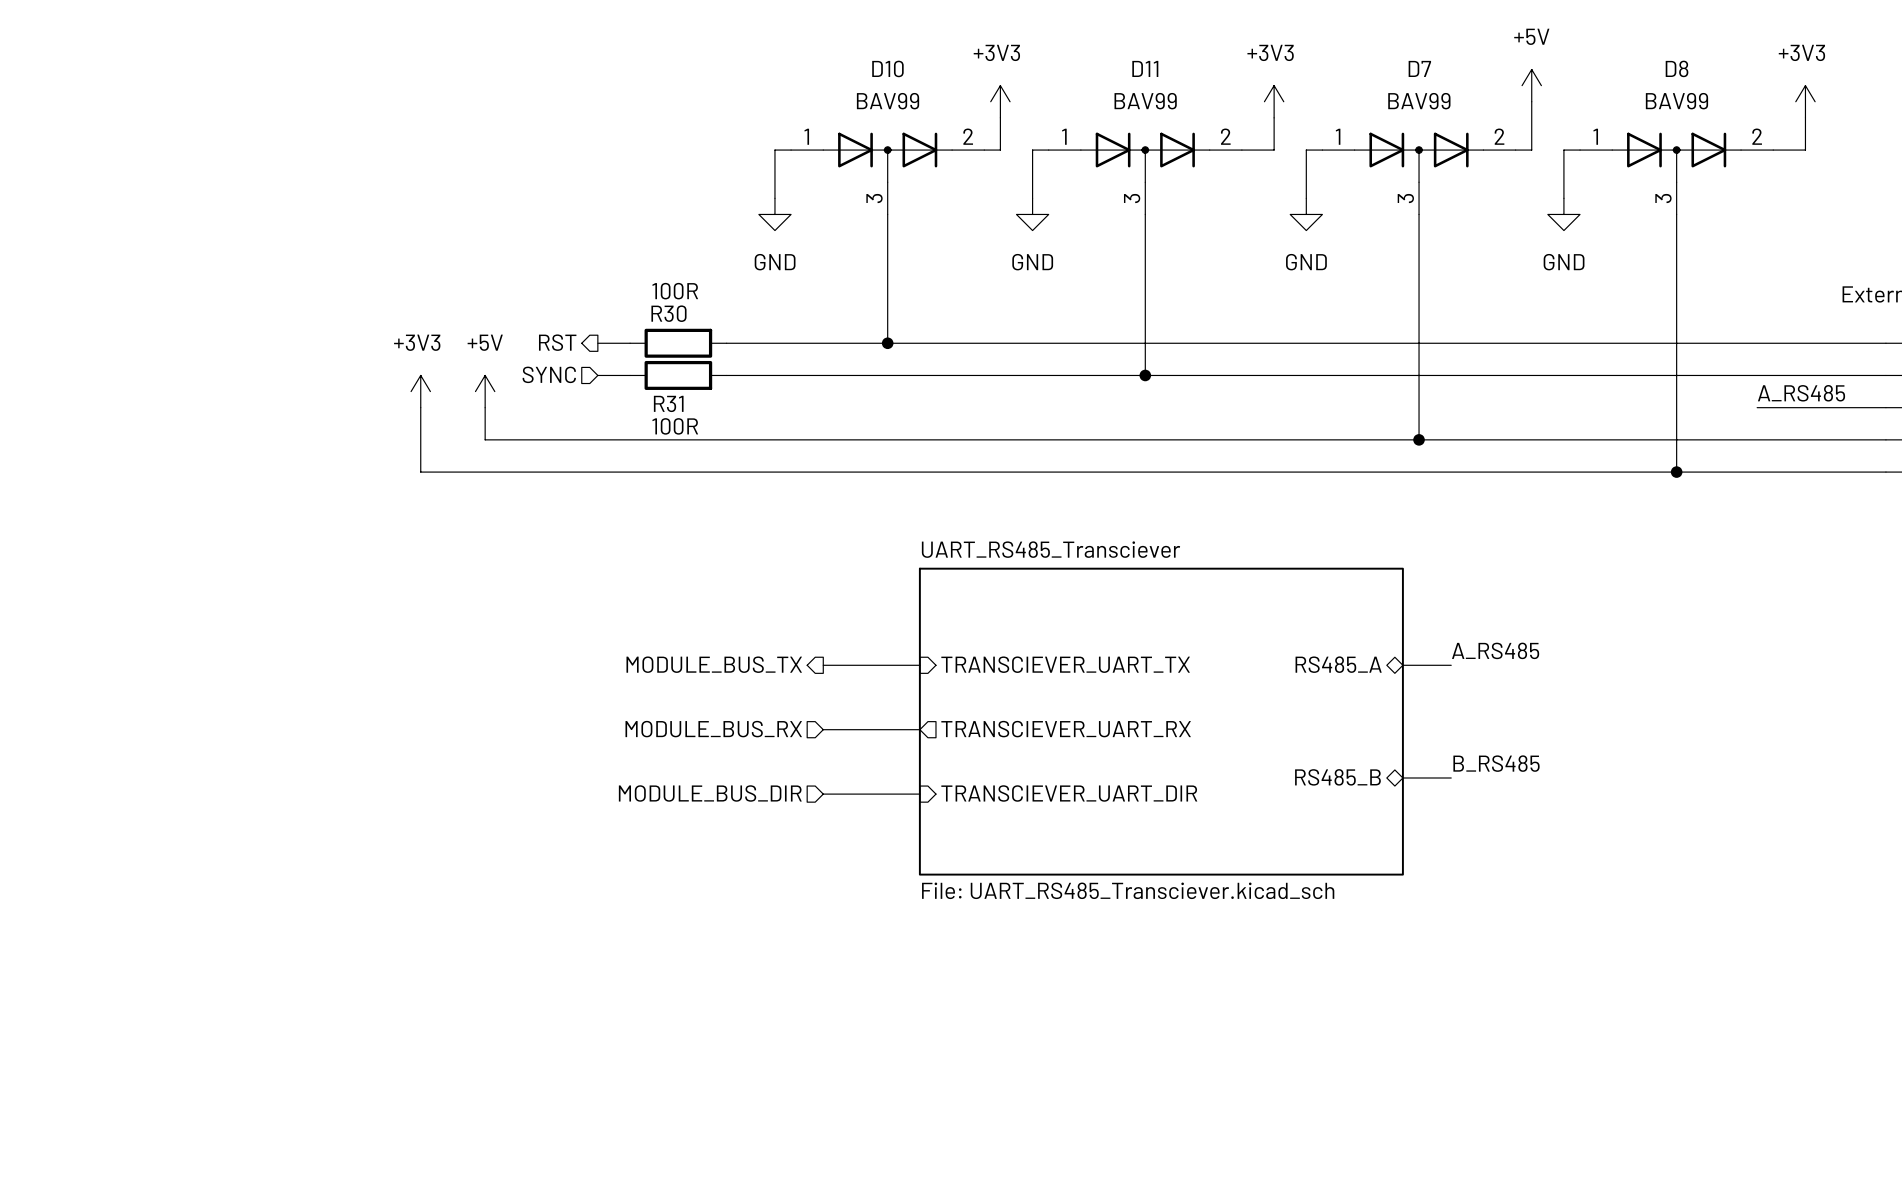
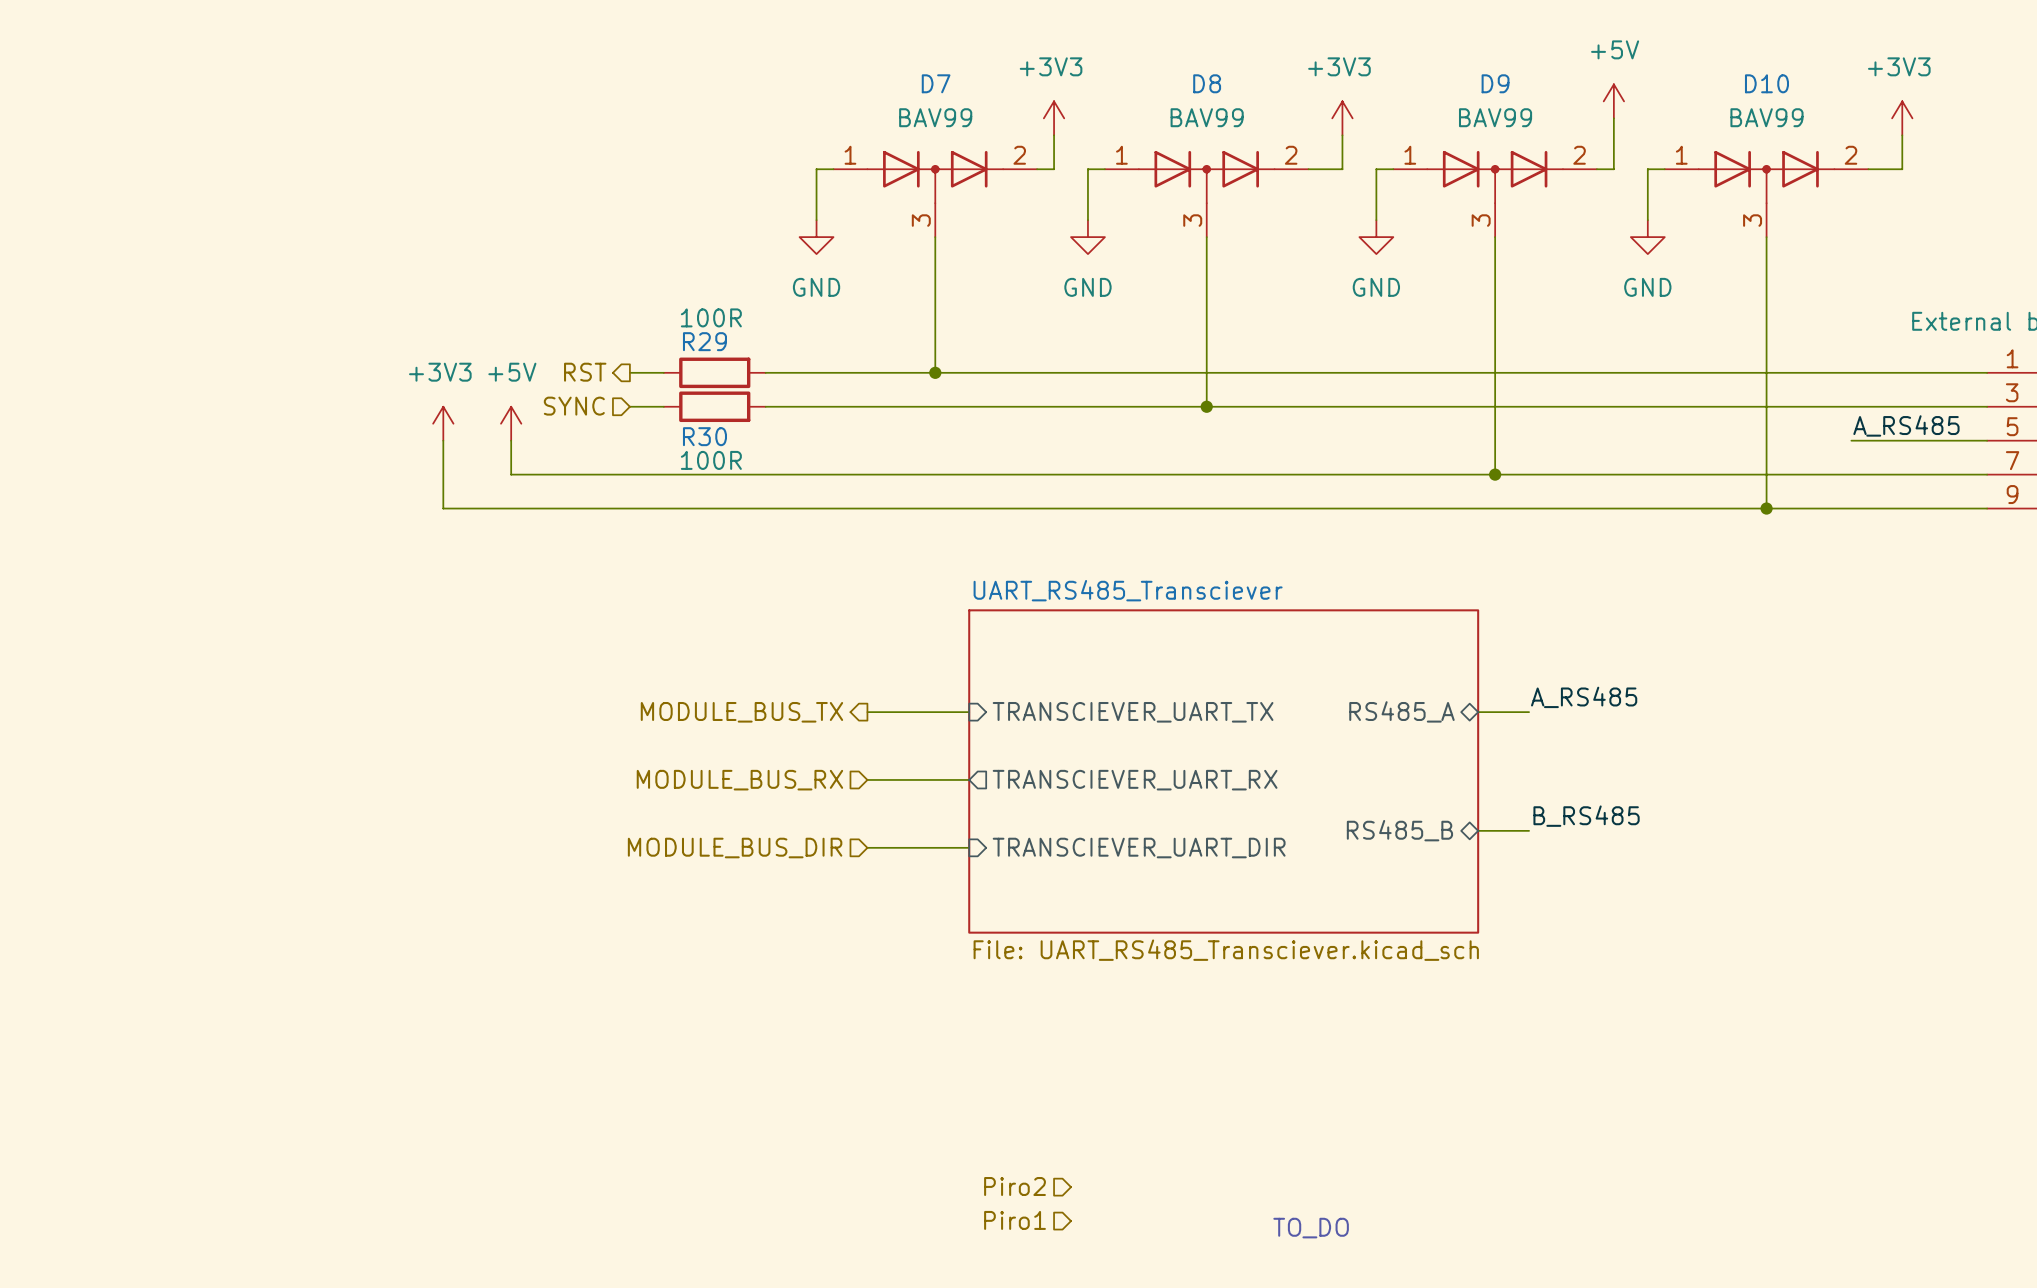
D10 name: D10 (887, 68) -> D7 (936, 83)
D11 name: D11 (1145, 68) -> D8 (1207, 83)
D7 name: D7 (1419, 68) -> D9 (1495, 83)
D8 name: D8 (1677, 68) -> D10 (1766, 83)
R30 name: R30 (668, 313) -> R29 (704, 341)
R31 name: R31 (668, 403) -> R30 (704, 436)
hierarchical label: none -> Piro2 (1015, 1186)
hierarchical label: none -> Piro1 (1015, 1220)
text: none -> TO_DO (1311, 1228)

